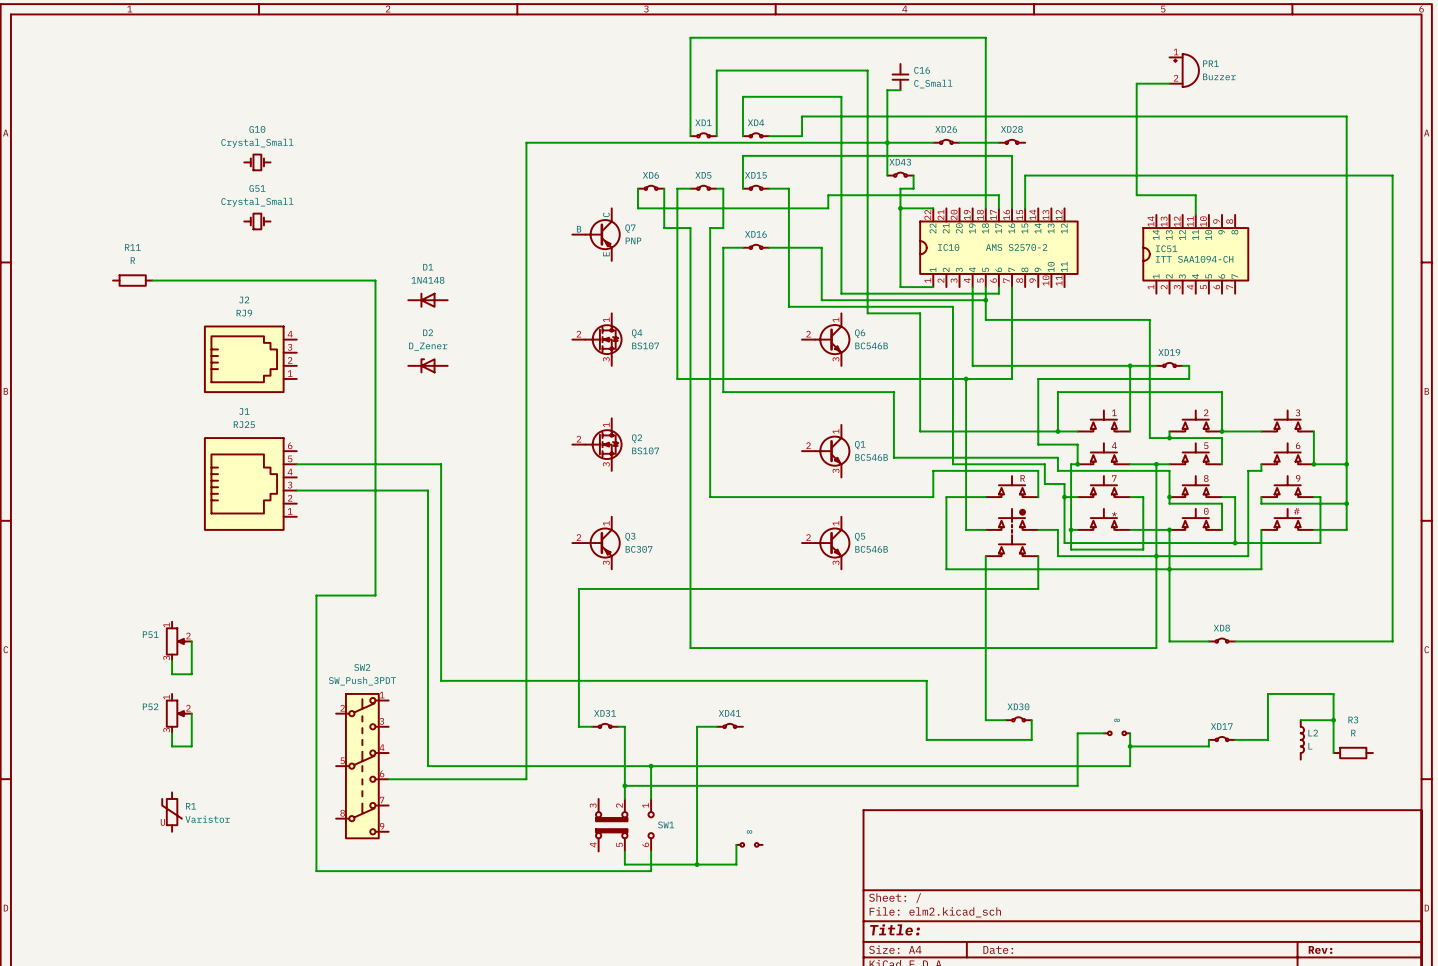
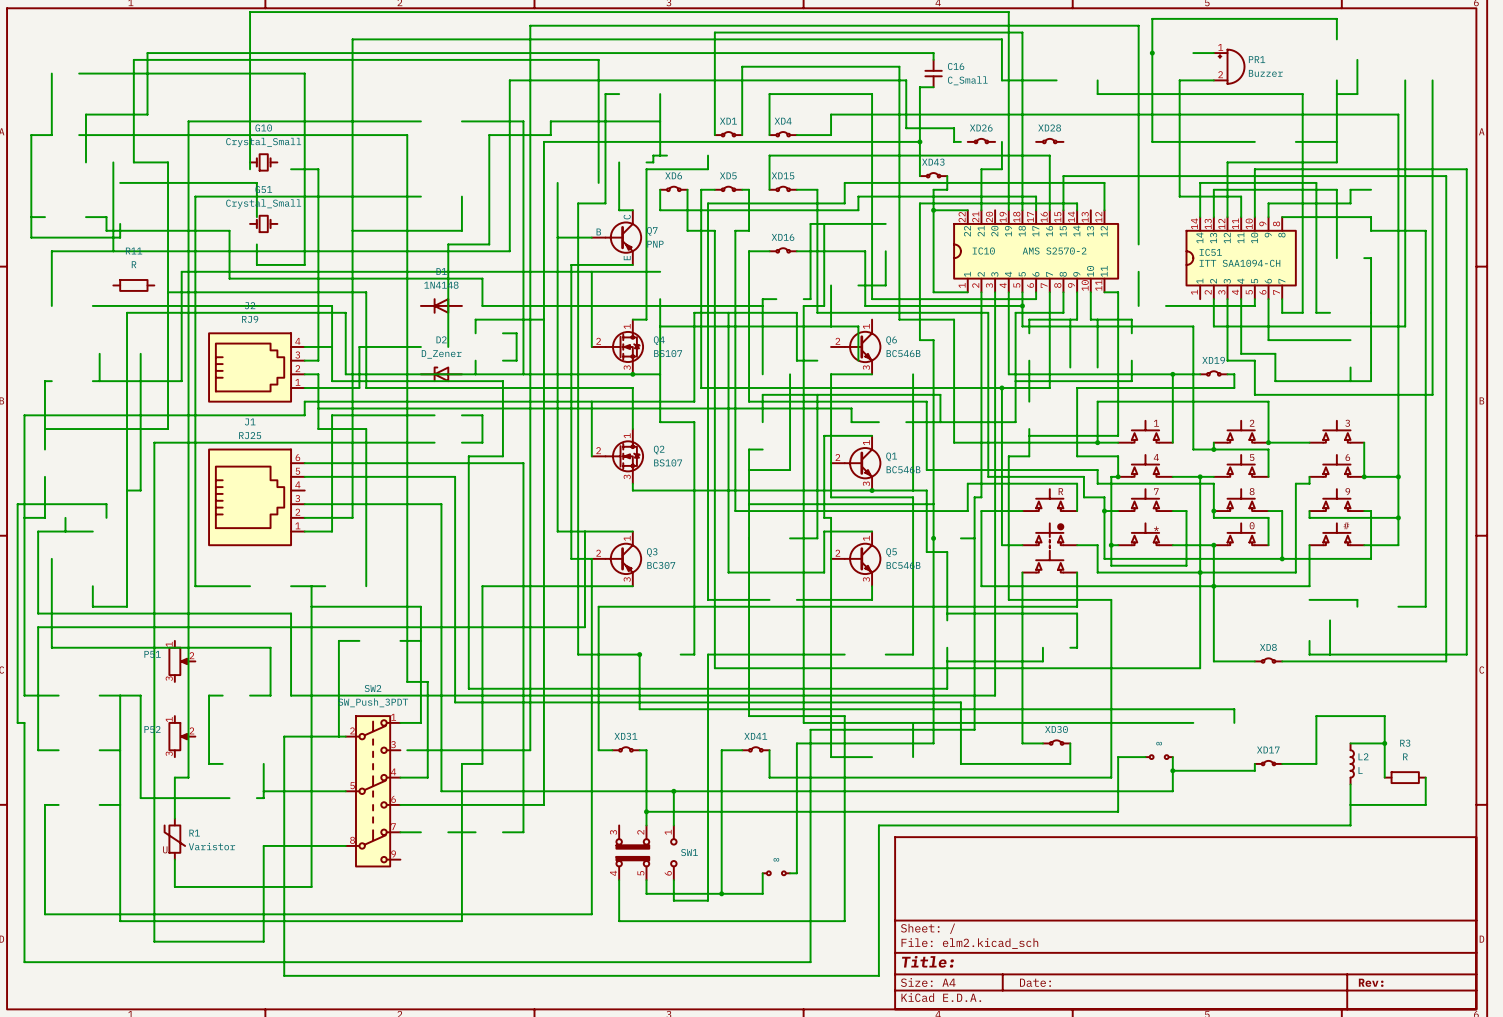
wire: none -> (1336, 39) (1336, 18) (1152, 18) (1152, 141) (1254, 141)
junction: none -> (1152, 53)
wire: none -> (1193, 53) (1213, 53)
wire: none -> (933, 59) (933, 53) (147, 53) (147, 114) (85, 114) (85, 162)
wire: none -> (1357, 59) (1357, 94) (1336, 94)
wire: none -> (51, 73) (51, 135) (31, 135) (31, 237) (120, 237) (120, 223)
wire: none -> (79, 73) (304, 73) (304, 264) (256, 264) (256, 244)
wire: none -> (1056, 80) (1001, 80) (1001, 39) (352, 39) (352, 517) (304, 517)
wire: none -> (1097, 80) (1097, 94) (1302, 94) (1302, 312) (1282, 312) (1282, 299)
wire: none -> (1336, 80) (1336, 162) (1227, 162) (1227, 217)
wire: none -> (1405, 80) (1405, 326) (1213, 326) (1213, 299)
wire: none -> (1432, 80) (1432, 394) (1254, 394) (1254, 360) (1227, 360) (1227, 299)
wire: none -> (619, 94) (605, 94) (605, 203) (578, 203) (578, 654) (639, 654) (639, 709) (1234, 709) (1234, 722)
wire: none -> (660, 94) (660, 155)
wire: none -> (420, 121) (188, 121) (188, 777) (174, 777) (174, 818)
wire: none -> (461, 121) (523, 121) (523, 374)
wire: none -> (660, 121) (550, 121) (550, 135) (489, 135) (489, 244) (448, 244) (448, 346)
wire: none -> (79, 135) (407, 135) (407, 681) (427, 681) (427, 777) (400, 777)
wire: (887, 142) (920, 142) -> (51, 305) (51, 251) (509, 251) (509, 80) (906, 80) (906, 128) (954, 128) (954, 141)
wire: (926, 142) (933, 142) -> none
wire: (959, 142) (998, 142) -> none
wire: none -> (1001, 141) (1001, 169) (981, 169) (981, 210)
wire: none -> (1295, 141) (1336, 141)
wire: none -> (667, 155) (653, 155) (653, 162) (646, 162)
wire: none -> (708, 155) (708, 169) (646, 169) (646, 319) (632, 319)
wire: none -> (113, 162) (113, 251)
wire: none -> (619, 162) (619, 210) (632, 210)
wire: none -> (250, 169) (250, 12) (1008, 12) (1008, 210)
wire: none -> (291, 169) (318, 169) (318, 360) (304, 360)
wire: none -> (120, 182) (256, 182) (256, 217)
wire: none -> (557, 182) (557, 531) (632, 531)
wire: none -> (598, 182) (598, 59) (133, 59) (133, 162) (168, 162) (168, 429) (44, 429)
wire: none -> (1371, 189) (1350, 189) (1350, 203) (1268, 203) (1268, 217)
wire: none -> (420, 196) (195, 196) (195, 586) (250, 586)
wire: none -> (461, 196) (461, 230) (352, 230)
wire: none -> (1077, 210) (1077, 203) (919, 203) (919, 340) (933, 340) (933, 743) (796, 743) (796, 873) (790, 873)
wire: none -> (1104, 210) (1104, 182) (844, 182) (844, 203) (708, 203) (708, 599) (769, 599)
wire: none -> (31, 217) (44, 217)
wire: none -> (85, 217) (106, 217) (106, 230) (229, 230) (229, 278) (482, 278) (482, 305) (762, 305)
wire: none -> (1200, 217) (1200, 182) (1316, 182) (1316, 312) (1330, 312)
wire: none -> (1213, 217) (1213, 189) (1336, 189) (1336, 258)
wire: none -> (1254, 217) (1254, 169) (1466, 169) (1466, 654) (1309, 654) (1309, 640)
wire: none -> (1282, 217) (1371, 217) (1371, 230) (1425, 230) (1425, 606) (1398, 606)
wire: none -> (824, 223) (824, 305) (803, 305) (803, 722) (1193, 722)
wire: none -> (885, 223) (810, 223) (810, 299) (803, 299)
wire: none -> (557, 237) (591, 237)
wire: none -> (1138, 244) (1138, 25) (530, 25) (530, 750) (407, 750)
wire: (821, 247) (821, 300) (834, 300) -> (851, 251) (865, 251) (865, 305)
wire: none -> (885, 251) (885, 285) (858, 285)
wire: none -> (1364, 258) (1371, 258) (1371, 381) (1275, 381) (1275, 353) (1241, 353) (1241, 299)
wire: none -> (632, 264) (571, 264) (571, 558) (591, 558) (591, 914) (44, 914) (44, 804) (58, 804)
wire: none -> (591, 271) (591, 346)
wire: none -> (660, 271) (181, 271) (181, 381) (92, 381)
wire: none -> (1138, 271) (1138, 305)
wire: (152, 280) (375, 280) (375, 595) (316, 595) (316, 871) (651, 871) -> (844, 654) (708, 654) (708, 900) (673, 900)
wire: none -> (831, 285) (831, 326)
wire: none -> (168, 292) (366, 292) (366, 387) (632, 387) (632, 429)
wire: none -> (981, 292) (981, 497) (974, 497) (974, 729) (810, 729) (810, 962) (24, 962) (24, 722) (17, 722) (17, 504) (106, 504) (106, 517)
wire: none -> (995, 292) (995, 695) (291, 695) (291, 613) (38, 613) (38, 531) (92, 531)
wire: none -> (1063, 292) (1063, 312) (1015, 312) (1015, 422) (906, 422)
wire: none -> (1077, 292) (1077, 319) (1029, 319) (1029, 333)
wire: none -> (1090, 292) (1090, 319) (1131, 319) (1131, 333)
wire: none -> (1104, 292) (1118, 292) (1118, 435) (1029, 435)
wire: none -> (660, 299) (660, 422) (694, 422) (694, 654) (680, 654)
wire: none -> (776, 299) (762, 299) (762, 374)
wire: none -> (1254, 299) (1254, 305) (1165, 305)
wire: none -> (1268, 299) (1268, 340) (1350, 340)
wire: none -> (92, 305) (332, 305) (332, 381) (502, 381) (502, 456) (468, 456) (468, 688) (947, 688) (947, 647)
wire: none -> (728, 312) (728, 572) (824, 572) (824, 531) (872, 531)
wire: none -> (543, 319) (475, 319) (475, 333)
wire: none -> (1070, 319) (1070, 367)
wire: none -> (1097, 319) (1097, 367)
wire: none -> (660, 326) (858, 326) (858, 360)
wire: none -> (502, 333) (516, 333) (516, 360) (502, 360)
wire: none -> (304, 346) (332, 346)
wire: none -> (420, 346) (359, 346) (359, 387) (304, 387)
wire: none -> (99, 353) (99, 381)
wire: none -> (140, 353) (140, 490) (127, 490)
wire: none -> (475, 360) (475, 374)
wire: none -> (817, 360) (796, 360) (796, 312) (694, 312) (694, 401) (304, 401) (304, 415) (24, 415) (24, 695) (58, 695)
wire: none -> (1029, 360) (1029, 401)
wire: none -> (1131, 360) (1131, 381) (1015, 381)
wire: none -> (1350, 367) (1350, 381)
wire: none -> (304, 374) (318, 374) (318, 429) (366, 429) (366, 586)
junction: none -> (632, 374)
wire: none -> (660, 374) (345, 374) (345, 312) (127, 312) (127, 606) (92, 606) (92, 586)
wire: none -> (790, 374) (790, 470) (749, 470)
wire: none -> (872, 374) (831, 374) (831, 497) (913, 497) (913, 654) (885, 654)
wire: none -> (913, 374) (913, 490)
wire: none -> (51, 381) (44, 381) (44, 449)
wire: none -> (817, 394) (817, 538) (790, 538)
wire: none -> (591, 401) (591, 456)
wire: none -> (318, 408) (851, 408) (851, 422) (878, 422)
wire: none -> (434, 415) (332, 415) (332, 531) (304, 531)
wire: none -> (461, 415) (482, 415) (482, 442) (461, 442)
wire: none -> (762, 422) (762, 394) (940, 394) (940, 422)
wire: none -> (1029, 429) (1029, 456) (1008, 456) (1008, 599) (1111, 599) (1111, 777) (769, 777) (769, 750)
wire: none -> (872, 435) (824, 435) (824, 517) (831, 517) (831, 757) (872, 757)
wire: none -> (434, 442) (154, 442) (154, 941) (263, 941) (263, 845) (345, 845)
wire: none -> (762, 449) (749, 449) (749, 716) (844, 716) (844, 921) (619, 921) (619, 880)
wire: none -> (304, 463) (523, 463) (523, 832) (502, 832)
wire: none -> (44, 476) (44, 517) (24, 517)
wire: none -> (632, 483) (632, 490) (926, 490) (926, 552) (947, 552) (947, 620)
junction: none -> (872, 490)
wire: none -> (749, 504) (933, 504)
wire: none -> (65, 517) (65, 531)
wire: none -> (584, 531) (584, 627) (38, 627) (38, 750) (58, 750)
junction: none -> (933, 538)
wire: none -> (960, 538) (974, 538)
wire: none -> (51, 558) (51, 647) (270, 647) (270, 695) (250, 695)
wire: none -> (291, 586) (325, 586)
wire: none -> (311, 586) (311, 886) (174, 886) (174, 859)
wire: none -> (632, 586) (482, 586) (482, 763) (461, 763) (461, 921) (120, 921) (120, 695)
wire: none -> (872, 586) (872, 599) (796, 599)
wire: none -> (1309, 599) (1357, 599) (1357, 606)
wire: none -> (311, 606) (420, 606) (420, 722) (400, 722)
wire: none -> (947, 613) (1077, 613) (1077, 647) (1070, 647)
wire: none -> (1330, 620) (1330, 654)
wire: none -> (359, 640) (338, 640) (338, 736)
wire: none -> (400, 640) (420, 640)
wire: none -> (1042, 647) (1042, 661) (947, 661)
junction: none -> (639, 654)
wire: (191, 641) (191, 674) (172, 674) (172, 661) -> none
wire: none -> (99, 695) (140, 695) (140, 798) (229, 798)
wire: none -> (222, 695) (209, 695) (209, 763) (222, 763)
wire: none -> (913, 722) (913, 757)
wire: (191, 713) (191, 746) (172, 746) (172, 733) -> none
wire: none -> (345, 736) (284, 736) (284, 975) (878, 975) (878, 825) (1350, 825) (1350, 784)
wire: none -> (99, 750) (120, 750)
wire: none -> (263, 763) (263, 798) (256, 798)
wire: none -> (1425, 777) (1425, 804) (1350, 804)
wire: none -> (263, 791) (345, 791)
wire: none -> (99, 804) (120, 804)
wire: none -> (400, 832) (420, 832)
wire: none -> (448, 832) (475, 832)

